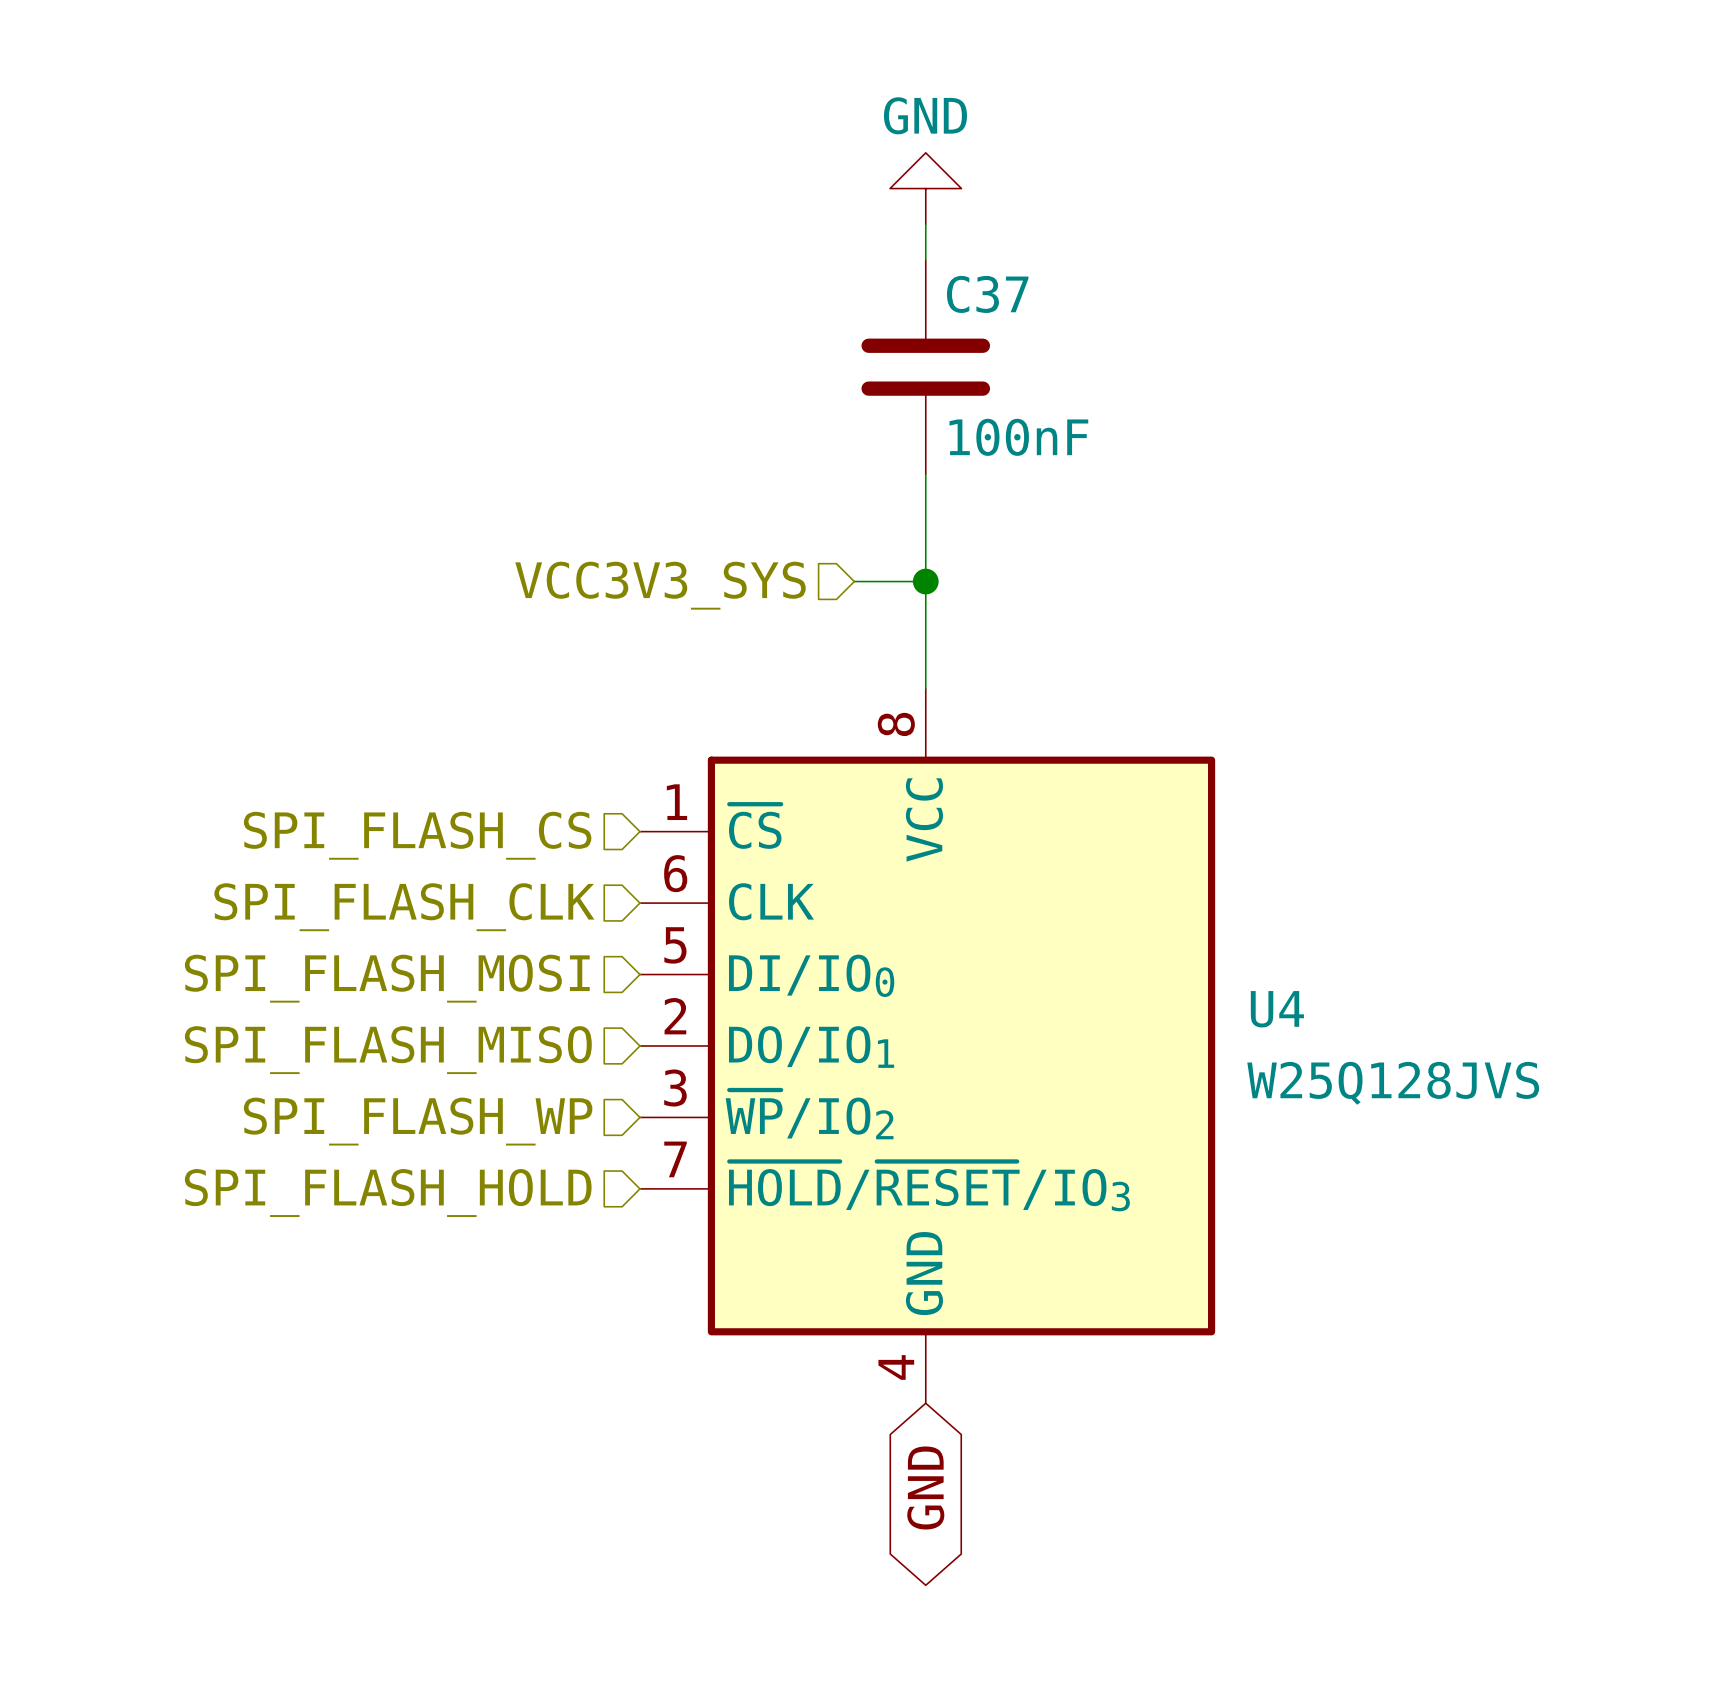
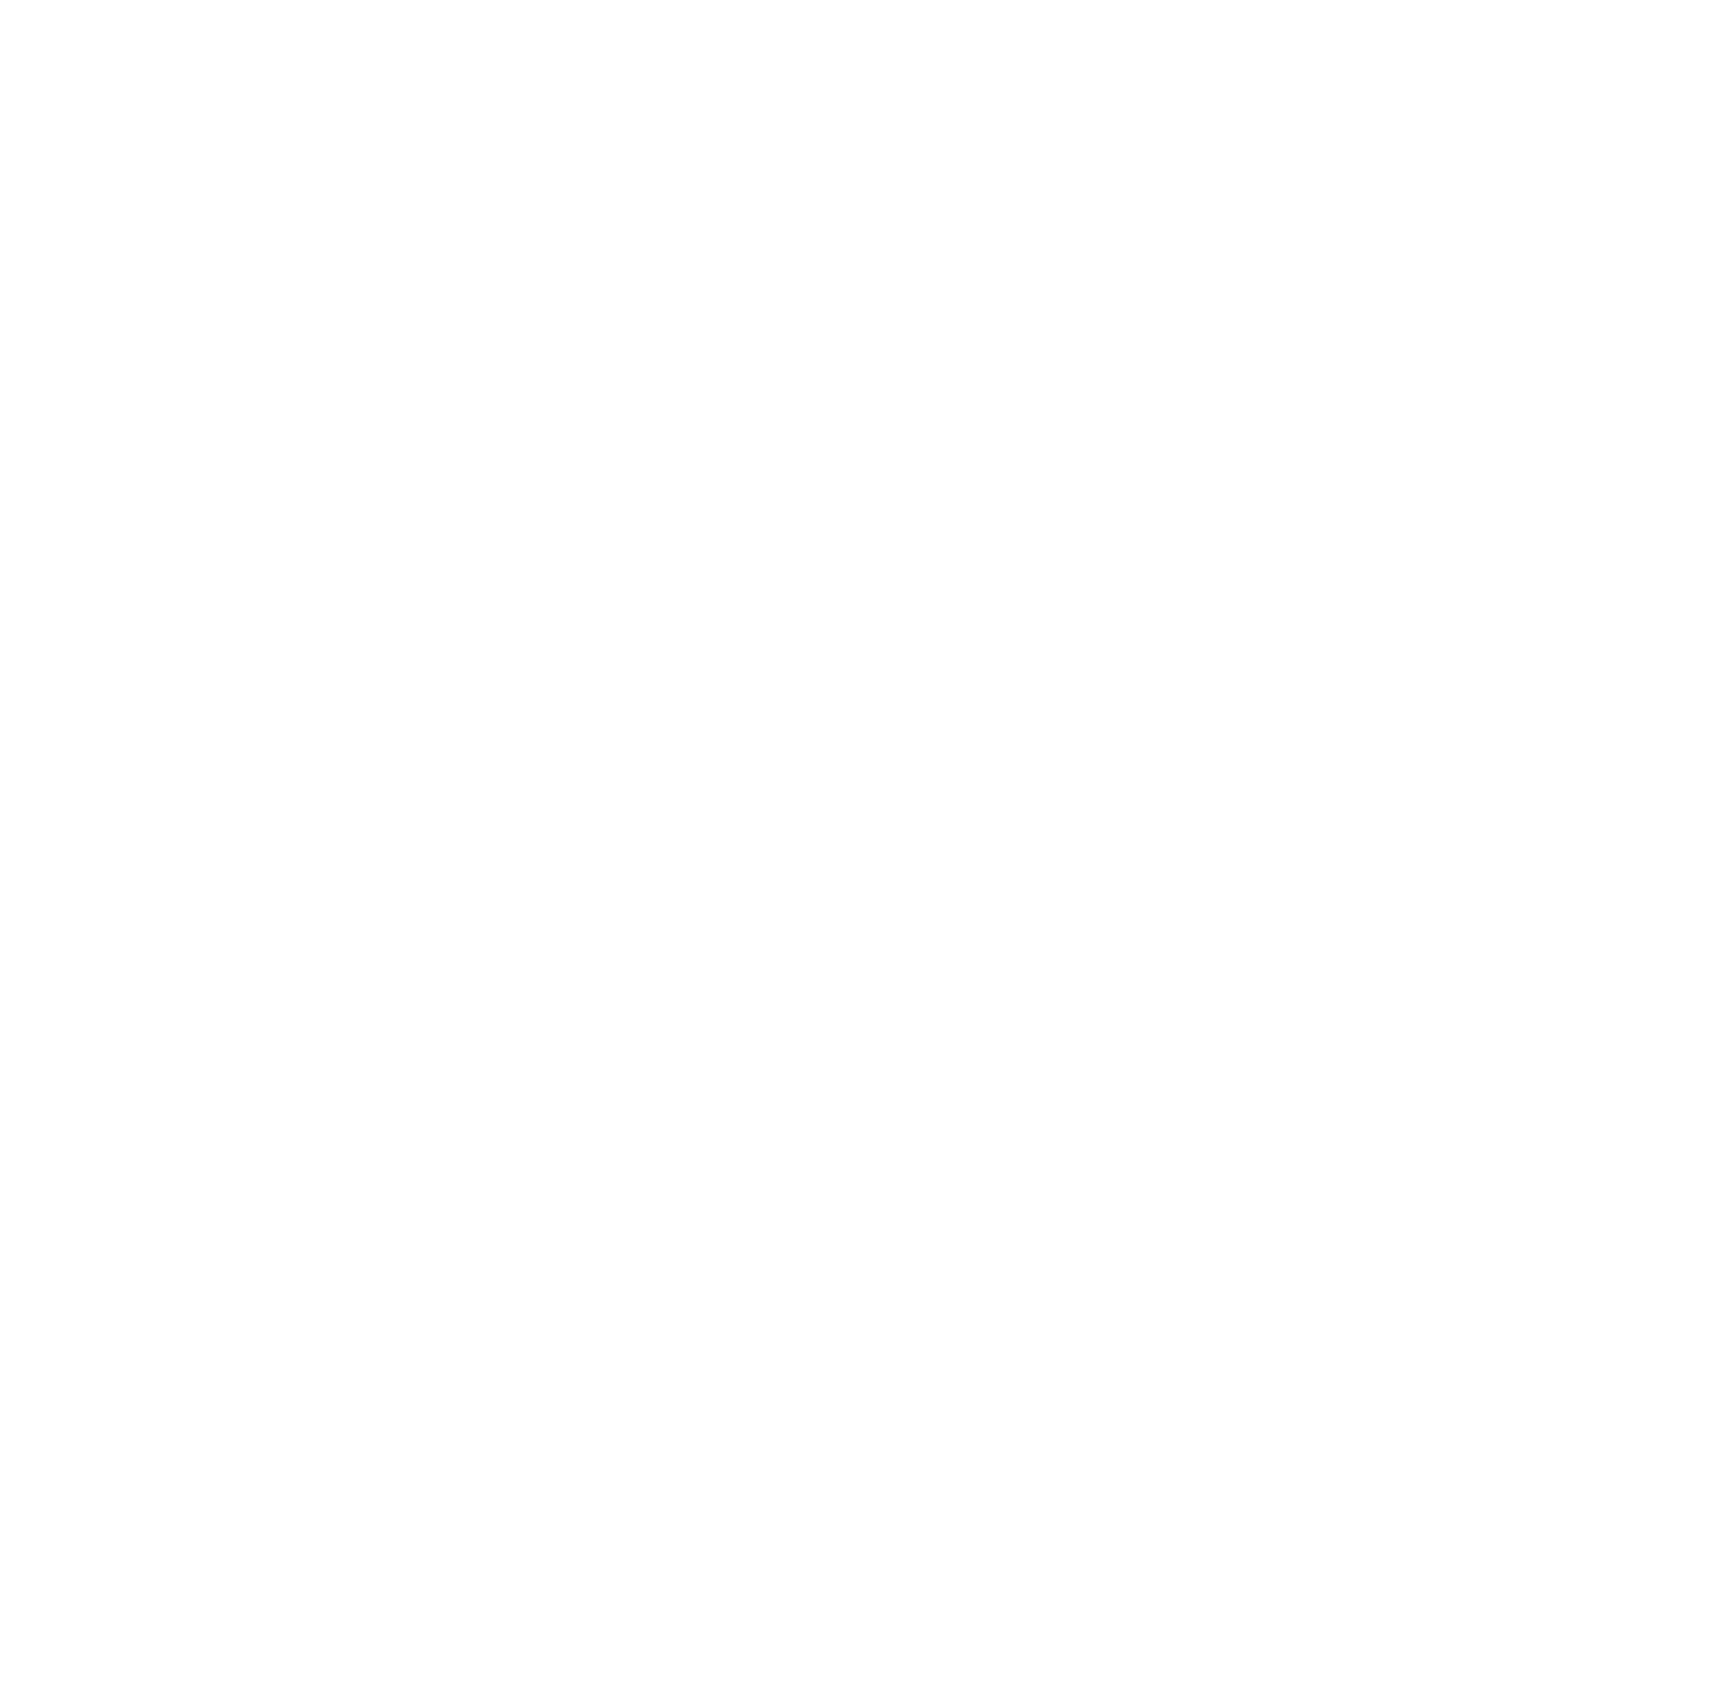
power symbol: GND (925, 188) -> none
wire: (925, 224) (925, 260) -> none
C37: 100nF (925, 367) -> none
wire: (925, 474) (925, 688) -> none
wire: (854, 581) (925, 581) -> none
junction: (925, 581) -> none
hierarchical label: VCC3V3_SYS (660, 585) -> none
hierarchical label: SPI_FLASH_CS (417, 835) -> none
hierarchical label: SPI_FLASH_CLK (404, 907) -> none
hierarchical label: SPI_FLASH_MOSI (387, 978) -> none
U4: W25Q128JVS (927, 1045) -> none
hierarchical label: SPI_FLASH_MISO (388, 1050) -> none
hierarchical label: SPI_FLASH_WP (418, 1121) -> none
hierarchical label: SPI_FLASH_HOLD (388, 1193) -> none
global label: GND (925, 1487) -> none

